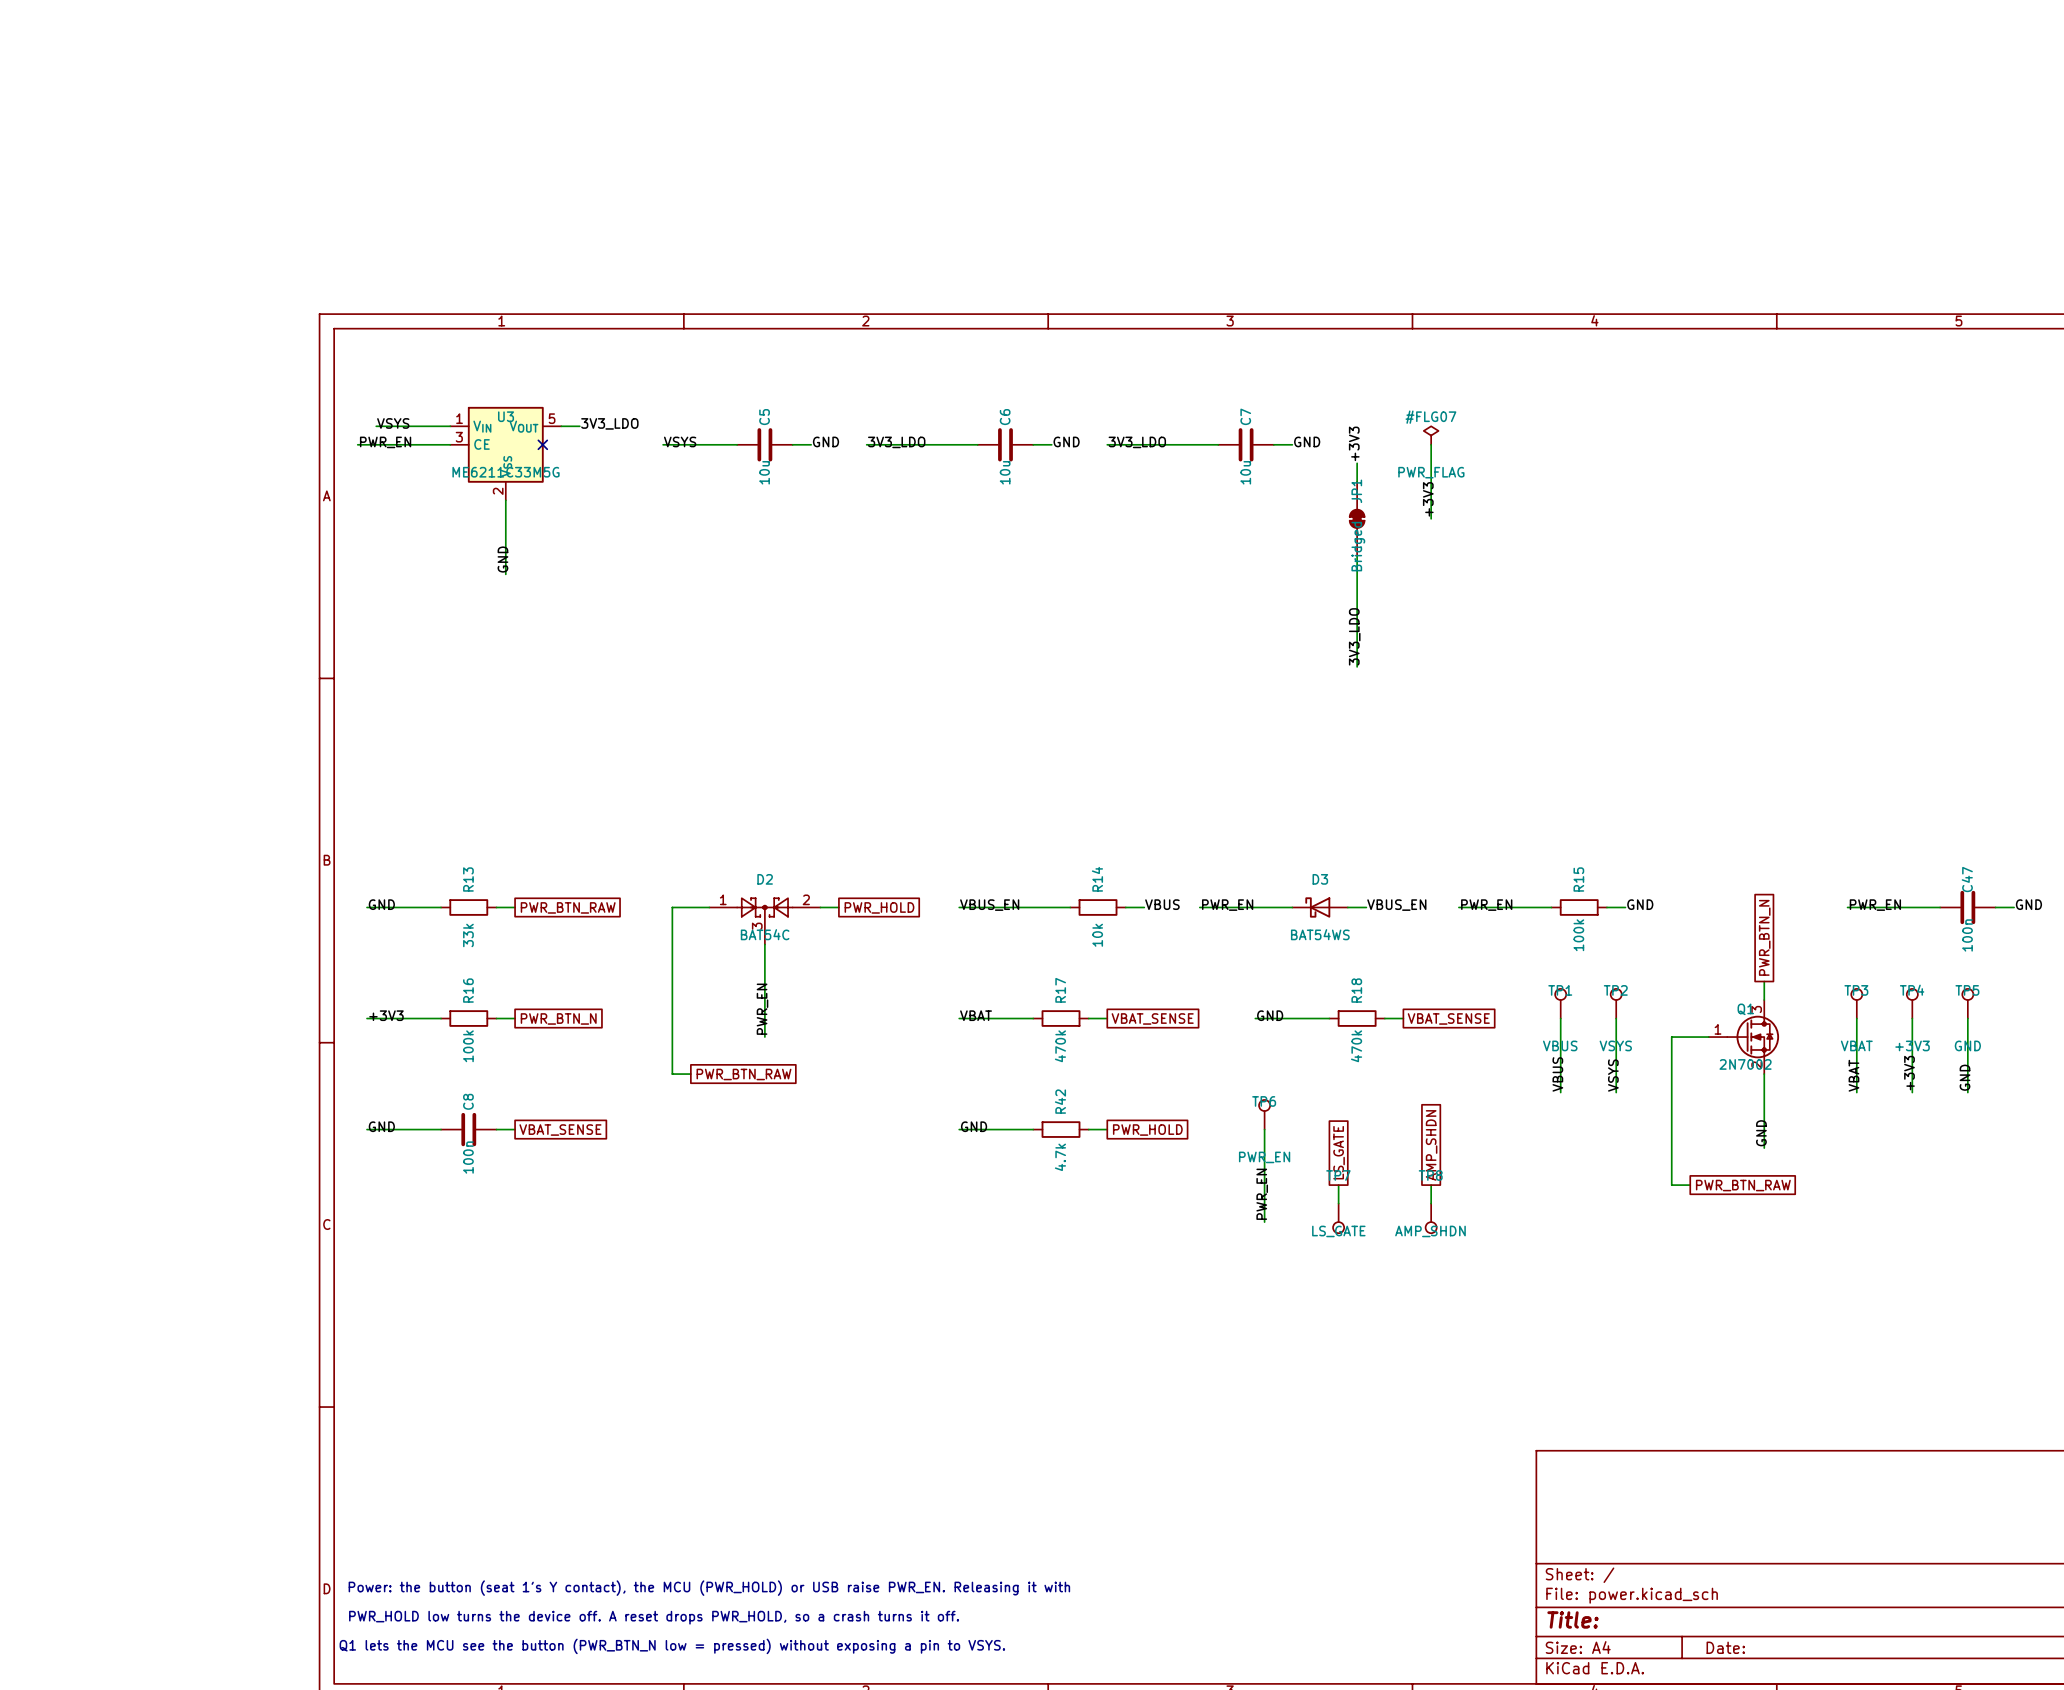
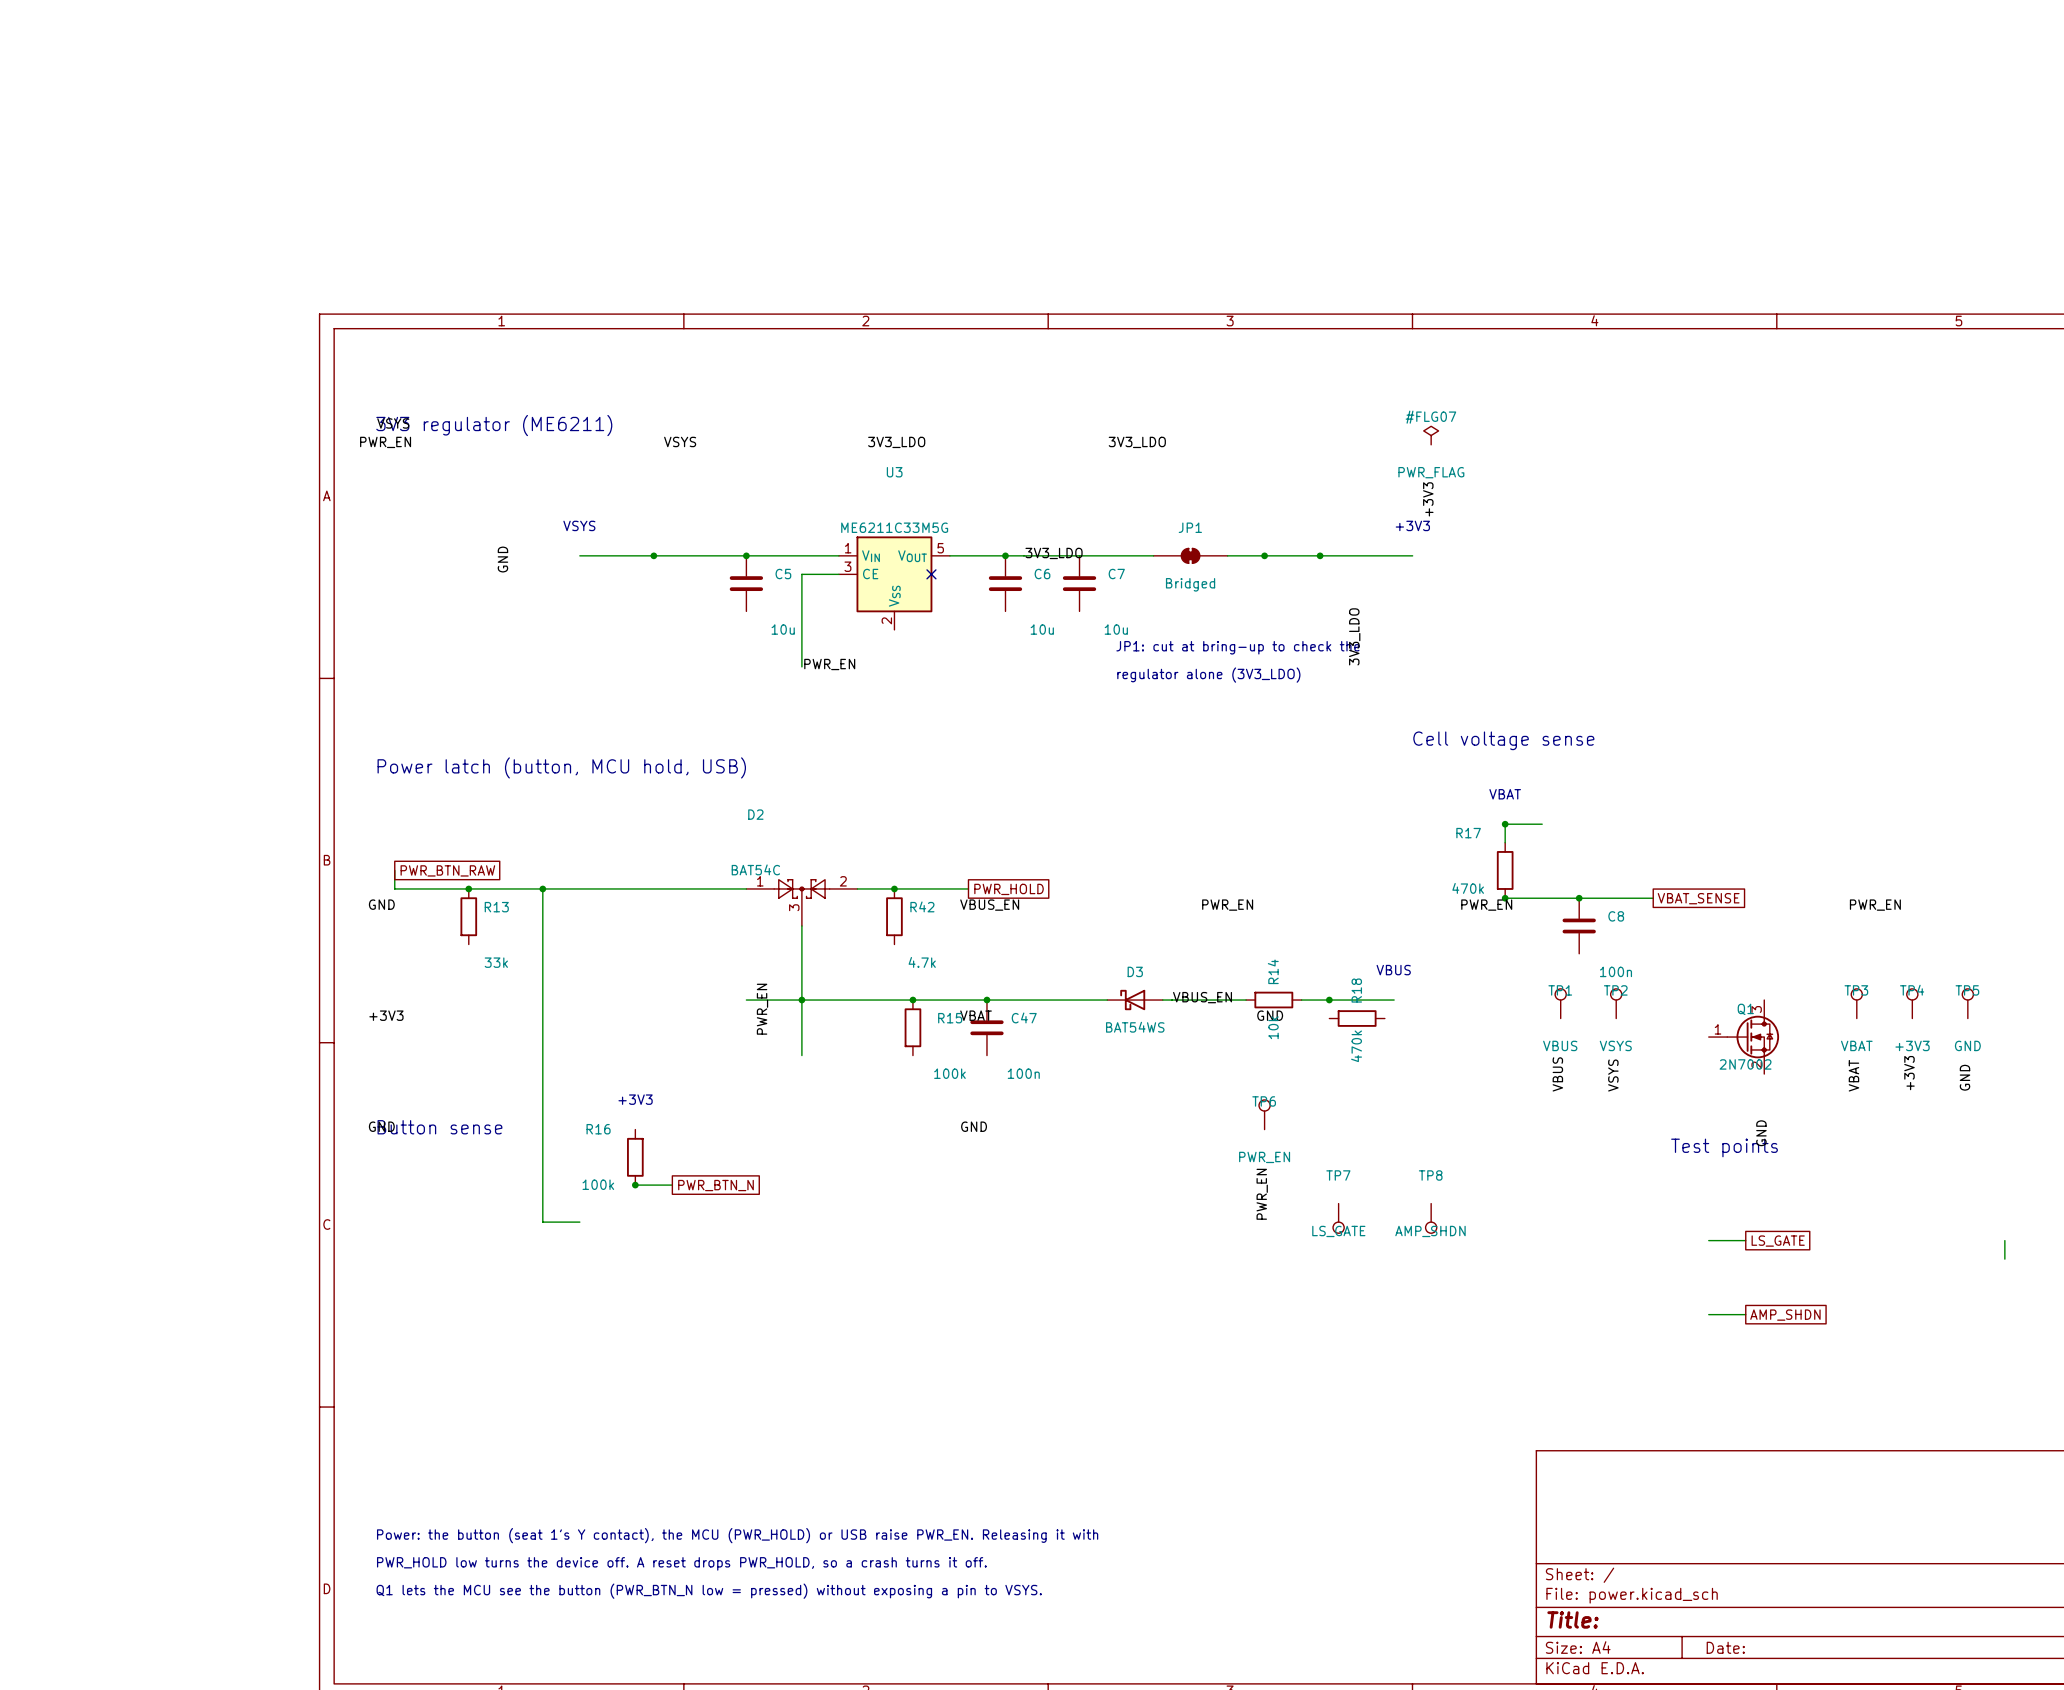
U3 name position: U3 (506, 416) -> U3 (894, 472)
label: 3V3_LDO (609, 423) -> none
text: none -> 3V3 regulator (ME6211) (494, 425)
wire: (376, 426) (450, 426) -> none
wire: (561, 426) (579, 426) -> none
label: GND (825, 441) -> none
label: GND (1066, 441) -> none
label: GND (1307, 441) -> none
label: +3V3 (1354, 443) -> none
wire: (357, 444) (450, 444) -> none
no-connect mark: (542, 444) -> none
wire: (663, 444) (737, 444) -> none
C5 rotation: 0° (764, 444) -> 90° clockwise (746, 583)
C5 position: (764, 444) -> (746, 583)
wire: (792, 444) (811, 444) -> none
wire: (866, 444) (977, 444) -> none
C6 rotation: 0° (1005, 444) -> 90° clockwise (1005, 583)
C6 position: (1005, 444) -> (1005, 583)
wire: (1033, 444) (1051, 444) -> none
wire: (1107, 444) (1218, 444) -> none
C7 rotation: 0° (1246, 444) -> 90° clockwise (1079, 583)
C7 position: (1246, 444) -> (1079, 583)
wire: (1273, 444) (1292, 444) -> none
wire: (1431, 444) (1431, 518) -> none
U3 position: (505, 453) -> (894, 583)
wire: (1357, 463) (1357, 481) -> none
U3 value position: ME6211C33M5G (506, 472) -> ME6211C33M5G (894, 527)
C5 value position: 10u (764, 472) -> 10u (783, 629)
C6 value position: 10u (1005, 472) -> 10u (1042, 629)
C7 value position: 10u (1245, 472) -> 10u (1116, 629)
wire: (505, 500) (505, 574) -> none
JP1 rotation: 0° (1357, 518) -> 90° clockwise (1190, 555)
JP1 position: (1357, 518) -> (1190, 555)
text: none -> VSYS (579, 525)
text: none -> +3V3 (1412, 525)
label: none -> 3V3_LDO (1054, 553)
wire: none -> (579, 555) (838, 555)
junction: none -> (653, 555)
junction: none -> (746, 555)
wire: none -> (949, 555) (1153, 555)
junction: none -> (1005, 555)
wire: none -> (1227, 555) (1412, 555)
junction: none -> (1264, 555)
junction: none -> (1320, 555)
wire: (1357, 555) (1357, 666) -> none
wire: none -> (838, 574) (801, 574) (801, 666)
no-connect mark: none -> (931, 574)
text: none -> JP1: cut at bring-up to check the (1238, 647)
label: none -> PWR_EN (829, 664)
text: none -> regulator alone (3V3_LDO) (1208, 675)
text: none -> Cell voltage sense (1503, 740)
text: none -> Power latch (button, MCU hold, USB) (561, 767)
text: none -> VBAT (1505, 794)
junction: none -> (1505, 824)
wire: none -> (1542, 824) (1505, 824) (1505, 842)
wire: none -> (394, 870) (394, 888) (746, 888)
D2 name position: D2 (765, 879) -> D2 (755, 814)
junction: none -> (468, 888)
wire: none -> (542, 888) (542, 1222) (579, 1222)
junction: none -> (542, 888)
junction: none -> (894, 888)
wire: none -> (1505, 898) (1653, 898)
junction: none -> (1505, 898)
junction: none -> (1579, 898)
global label: none -> VBAT_SENSE (1698, 898)
label: VBUS (1162, 904) -> none
label: GND (1640, 904) -> none
label: GND (2028, 904) -> none
label: VBUS_EN (1396, 905) -> none
wire: (367, 907) (441, 907) -> none
R13 rotation: 0° (468, 907) -> 90° clockwise (468, 916)
wire: (496, 907) (515, 907) -> none
global label position: PWR_BTN_RAW (568, 907) -> PWR_BTN_RAW (447, 870)
wire: (709, 907) (672, 907) (672, 1074) (690, 1074) -> none
wire: (820, 907) (838, 907) -> none
global label position: PWR_HOLD (879, 907) -> PWR_HOLD (1009, 889)
wire: (959, 907) (1070, 907) -> (857, 888) (968, 888)
R14 position: (1098, 907) -> (1273, 1000)
wire: (1125, 907) (1144, 907) -> none
wire: (1199, 907) (1292, 907) -> (1301, 1000) (1394, 1000)
D3 position: (1320, 907) -> (1135, 1000)
wire: (1347, 907) (1366, 907) -> none
wire: (1458, 907) (1551, 907) -> none
R15 rotation: 0° (1579, 907) -> 90° clockwise (912, 1027)
R15 position: (1579, 907) -> (912, 1027)
wire: (1606, 907) (1625, 907) -> none
wire: (1847, 907) (1940, 907) -> none
C47 rotation: 0° (1967, 907) -> 90° clockwise (986, 1027)
C47 position: (1967, 907) -> (986, 1027)
wire: (1995, 907) (2014, 907) -> none
D2 position: (764, 921) -> (801, 902)
wire: none -> (801, 925) (801, 1055)
D2 value position: BAT54C (765, 934) -> BAT54C (755, 869)
R13 value position: 33k (468, 935) -> 33k (496, 962)
R15 value position: 100k (1578, 935) -> 100k (949, 1073)
C47 value position: 100n (1967, 935) -> 100n (1023, 1073)
global label: PWR_BTN_N (1764, 937) -> none
wire: (764, 944) (764, 1037) -> none
text: none -> VBUS (1393, 970)
wire: (1764, 981) (1764, 1000) -> none
R16 name position: R16 (468, 990) -> R16 (598, 1129)
R17 name position: R17 (1060, 990) -> R17 (1468, 833)
label: none -> VBUS_EN (1202, 997)
wire: none -> (746, 1000) (1107, 1000)
junction: none -> (801, 1000)
junction: none -> (912, 1000)
junction: none -> (986, 1000)
wire: none -> (1162, 1000) (1246, 1000)
junction: none -> (1329, 1000)
wire: (367, 1018) (441, 1018) -> none
R16 rotation: 0° (468, 1018) -> 90° clockwise (635, 1157)
R16 position: (468, 1018) -> (635, 1157)
wire: (496, 1018) (515, 1018) -> none
global label: PWR_BTN_N (558, 1018) -> none
wire: (959, 1018) (1033, 1018) -> none
R17 rotation: 0° (1061, 1018) -> 90° clockwise (1505, 870)
R17 position: (1061, 1018) -> (1505, 870)
wire: (1088, 1018) (1107, 1018) -> none
global label: VBAT_SENSE (1152, 1018) -> none
wire: (1255, 1018) (1329, 1018) -> none
wire: (1384, 1018) (1403, 1018) -> none
global label: VBAT_SENSE (1448, 1018) -> none
wire: (1560, 1018) (1560, 1092) -> none
wire: (1616, 1018) (1616, 1092) -> none
wire: (1856, 1018) (1856, 1092) -> none
wire: (1912, 1018) (1912, 1092) -> none
wire: (1967, 1018) (1967, 1092) -> none
wire: (1708, 1037) (1671, 1037) (1671, 1185) (1690, 1185) -> none
R16 value position: 100k (468, 1046) -> 100k (598, 1184)
R17 value position: 470k (1060, 1046) -> 470k (1468, 888)
global label: PWR_BTN_RAW (743, 1074) -> none
wire: (1764, 1074) (1764, 1148) -> none
text: none -> +3V3 (635, 1099)
text: none -> Button sense (439, 1127)
wire: (367, 1129) (441, 1129) -> none
C8 rotation: 0° (468, 1129) -> 90° clockwise (1579, 925)
C8 position: (468, 1129) -> (1579, 925)
wire: (496, 1129) (515, 1129) -> none
wire: (959, 1129) (1033, 1129) -> none
R42 rotation: 0° (1061, 1129) -> 90° clockwise (894, 916)
R42 position: (1061, 1129) -> (894, 916)
wire: (1088, 1129) (1107, 1129) -> none
wire: (1264, 1129) (1264, 1222) -> none
global label: VBAT_SENSE (560, 1130) -> none
global label: PWR_HOLD (1147, 1130) -> none
global label: AMP_SHDN (1431, 1145) -> none
text: none -> Test points (1724, 1147)
global label: LS_GATE (1339, 1152) -> none
C8 value position: 100n (468, 1157) -> 100n (1615, 971)
R42 value position: 4.7k (1060, 1157) -> 4.7k (922, 962)
wire: none -> (635, 1185) (672, 1185)
junction: none -> (635, 1185)
global label: none -> PWR_BTN_N (716, 1185)
wire: (1338, 1185) (1338, 1203) -> none
wire: (1431, 1185) (1431, 1203) -> none
global label: PWR_BTN_RAW (1743, 1185) -> none
wire: none -> (1708, 1240) (1745, 1240)
wire: none -> (2004, 1240) (2004, 1259)
global label: none -> LS_GATE (1778, 1241)
wire: none -> (1708, 1314) (1745, 1314)
global label: none -> AMP_SHDN (1785, 1315)
text position: Power: the button (seat 1's Y contact), the MCU (PWR_HOLD) or USB raise PWR_EN. Releasing it with (709, 1588) -> Power: the button (seat 1's Y contact), the MCU (PWR_HOLD) or USB raise PWR_EN. Releasing it with (737, 1535)
text position: PWR_HOLD low turns the device off. A reset drops PWR_HOLD, so a crash turns it off. (654, 1617) -> PWR_HOLD low turns the device off. A reset drops PWR_HOLD, so a crash turns it off. (681, 1563)
text position: Q1 lets the MCU see the button (PWR_BTN_N low = pressed) without exposing a pin to VSYS. (672, 1646) -> Q1 lets the MCU see the button (PWR_BTN_N low = pressed) without exposing a pin to VSYS. (709, 1591)

